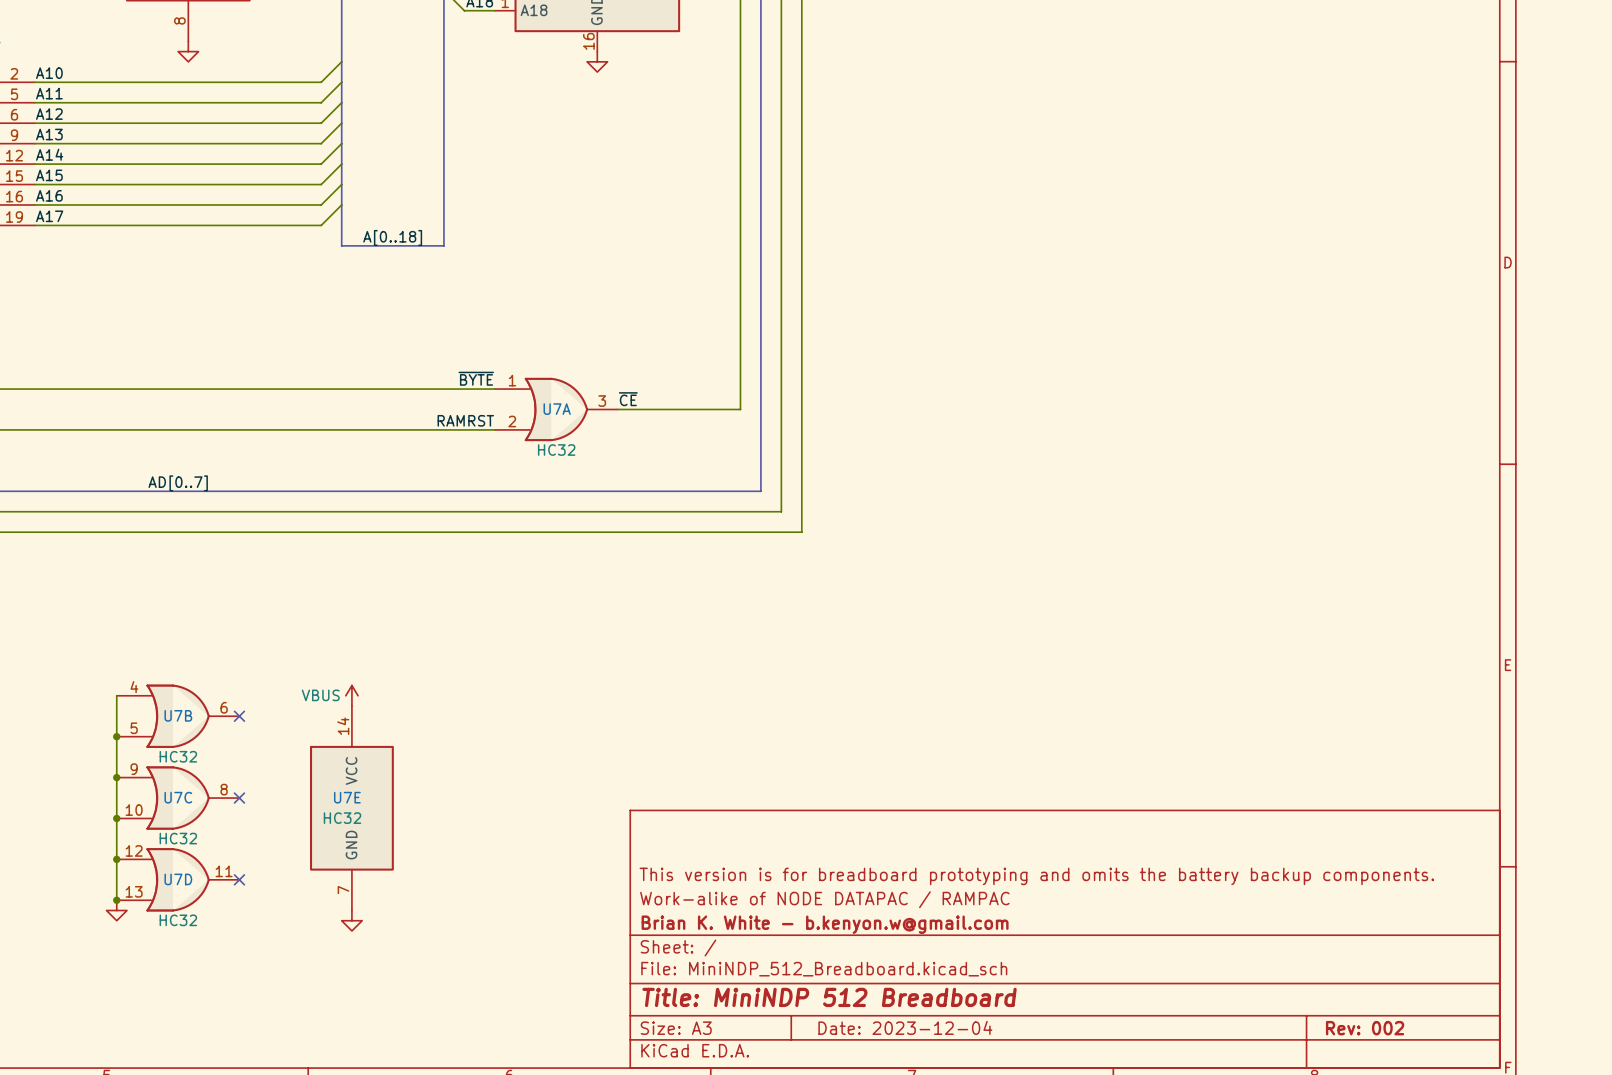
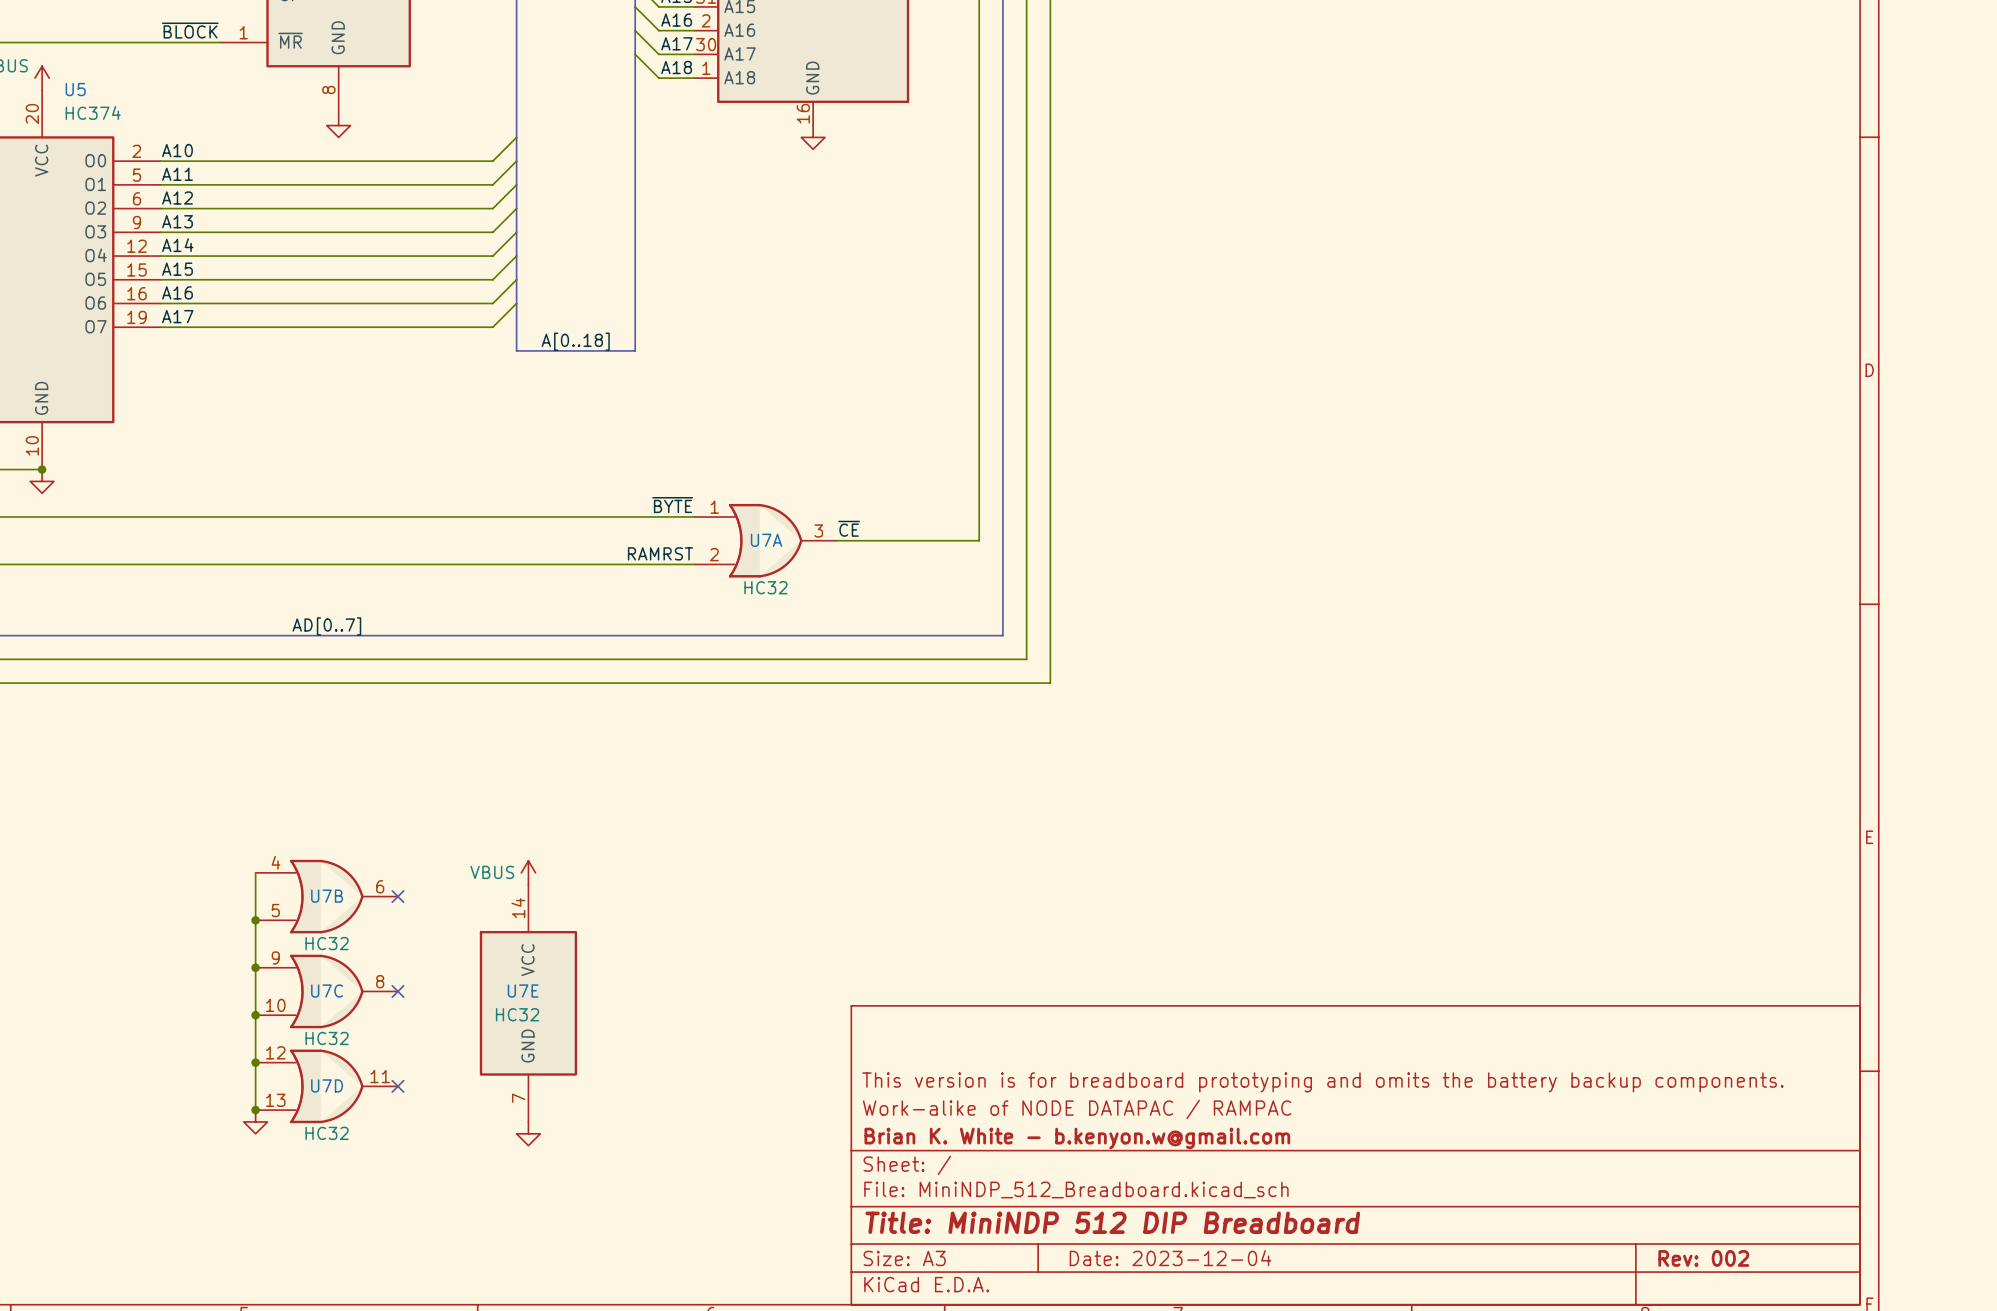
title block: Title: MiniNDP 512 Breadboard (829, 997) -> Title: MiniNDP 512 DIP Breadboard (1112, 1222)

